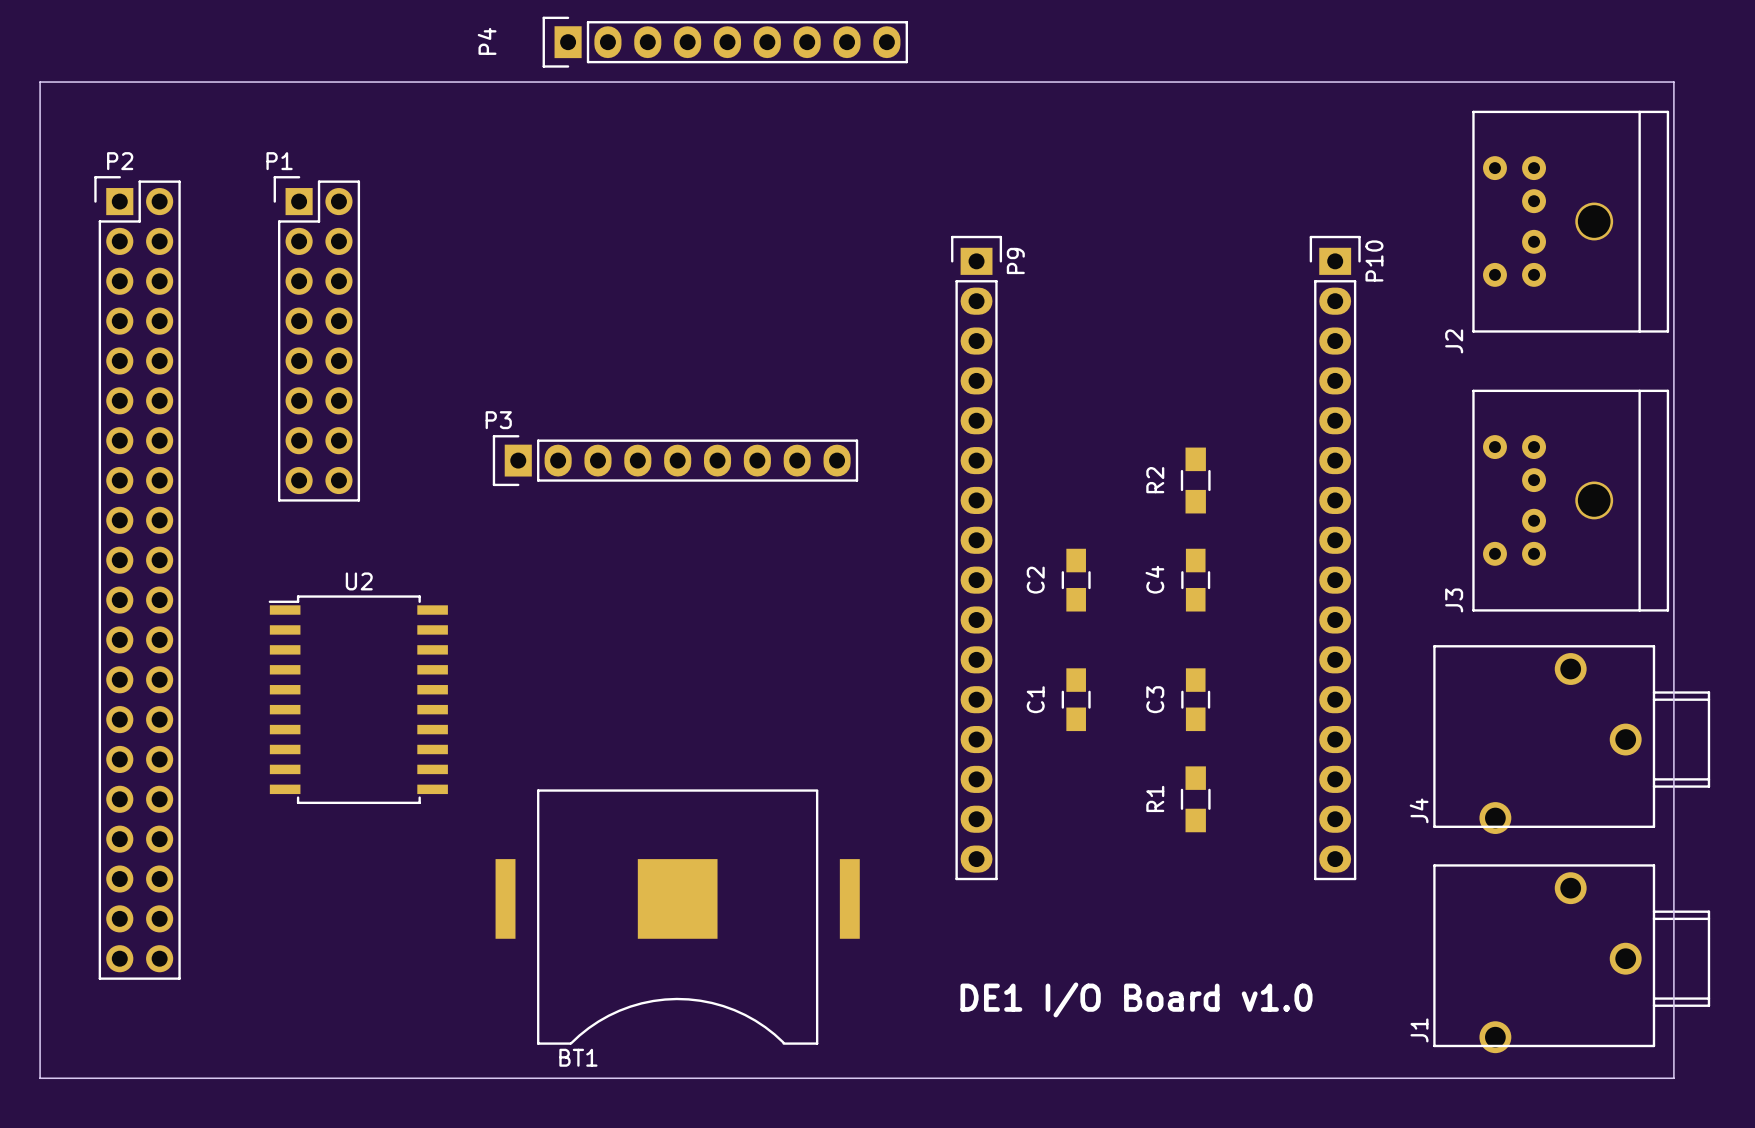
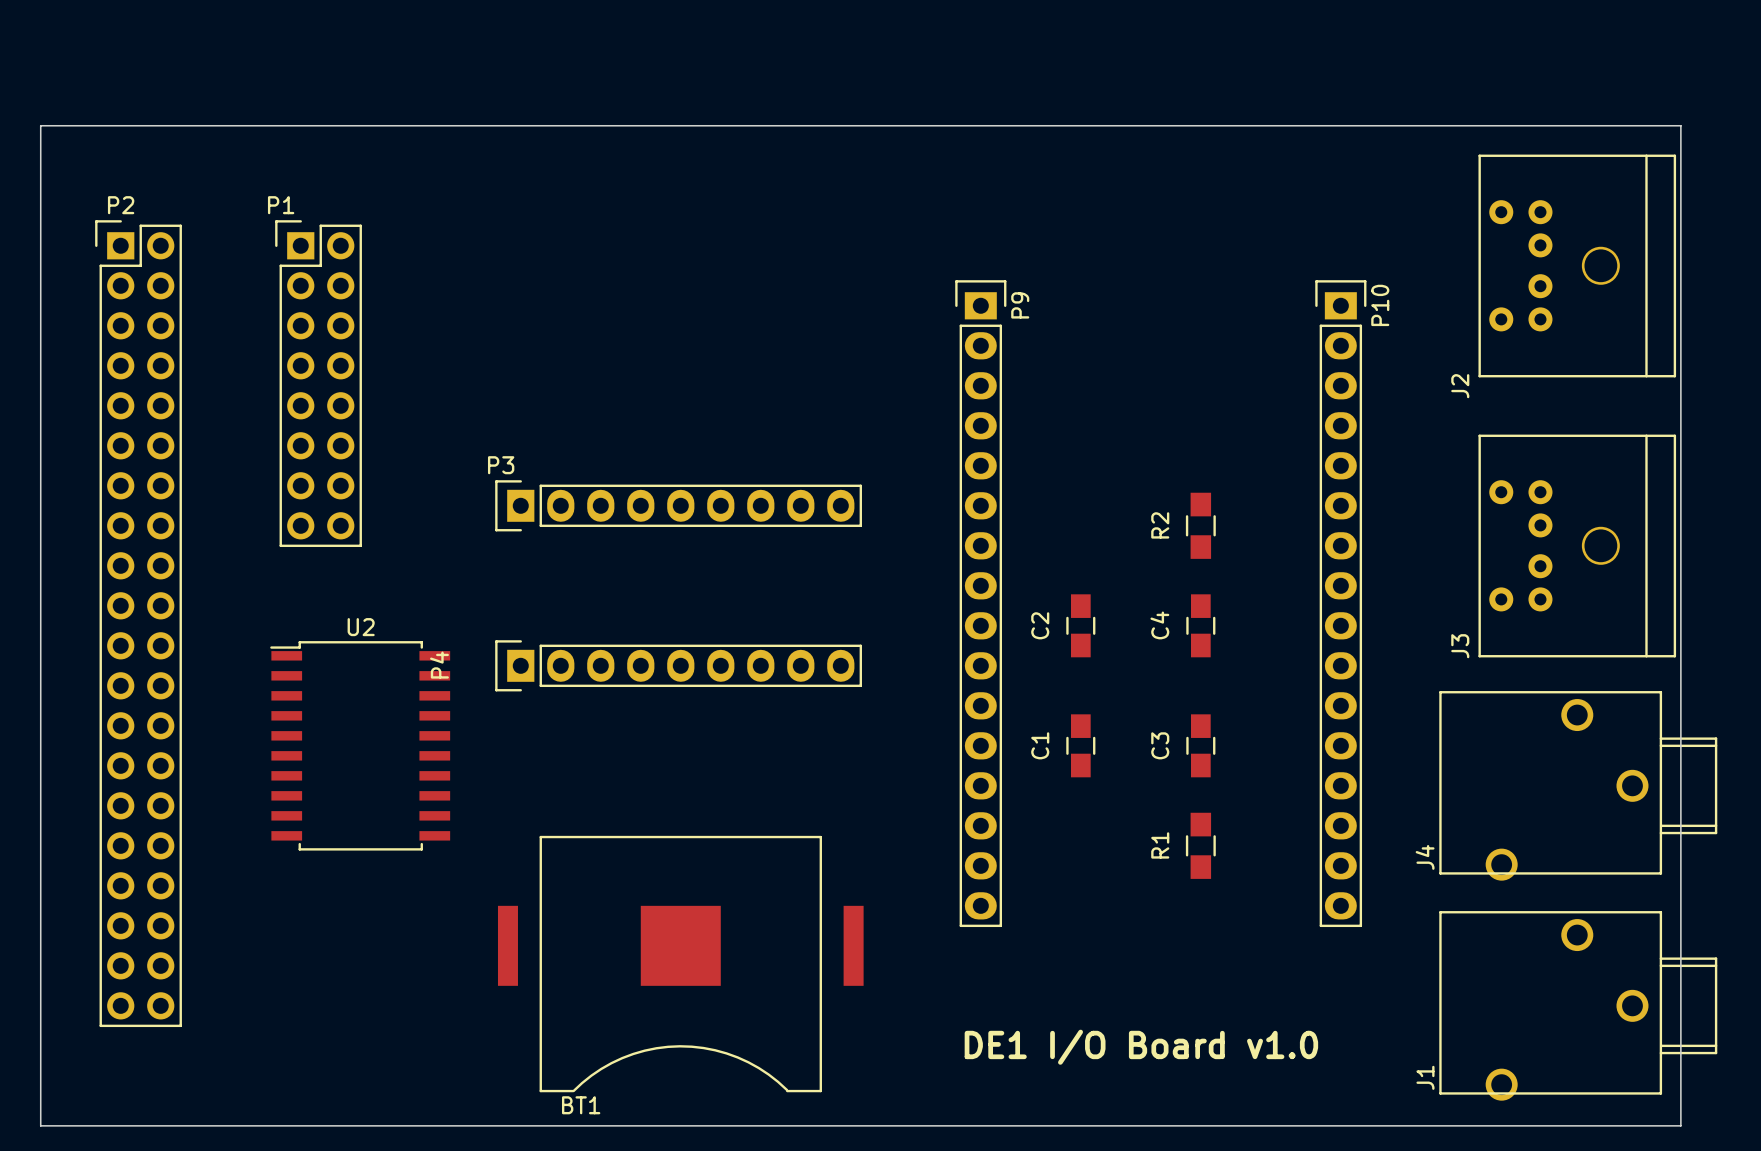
P4 position: (725, 42) -> (678, 665)

